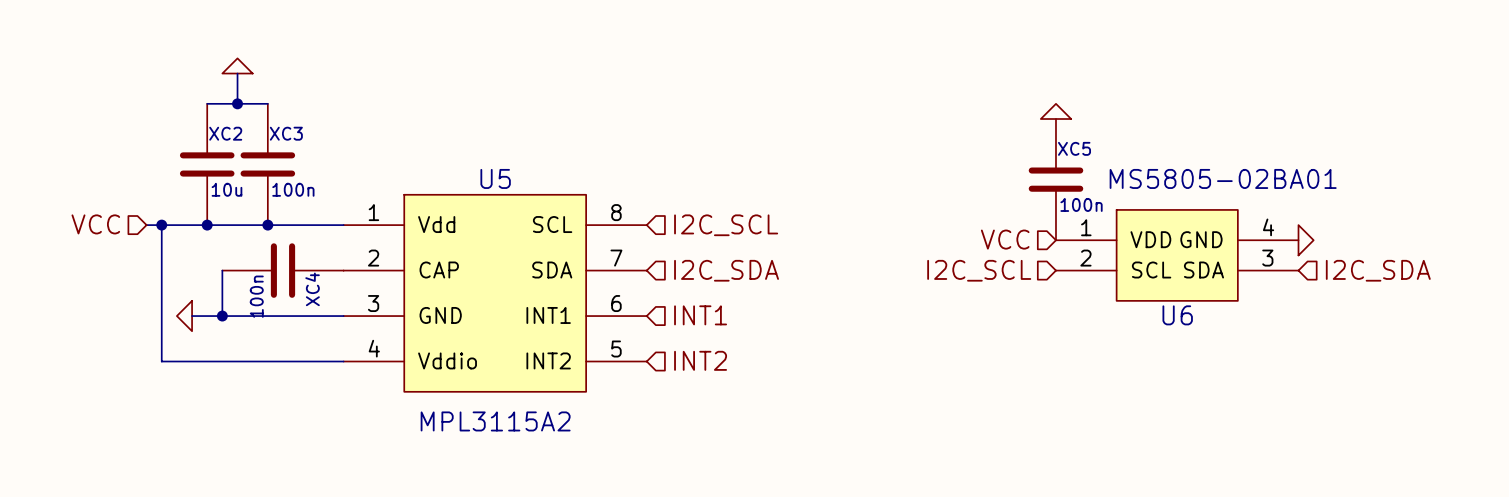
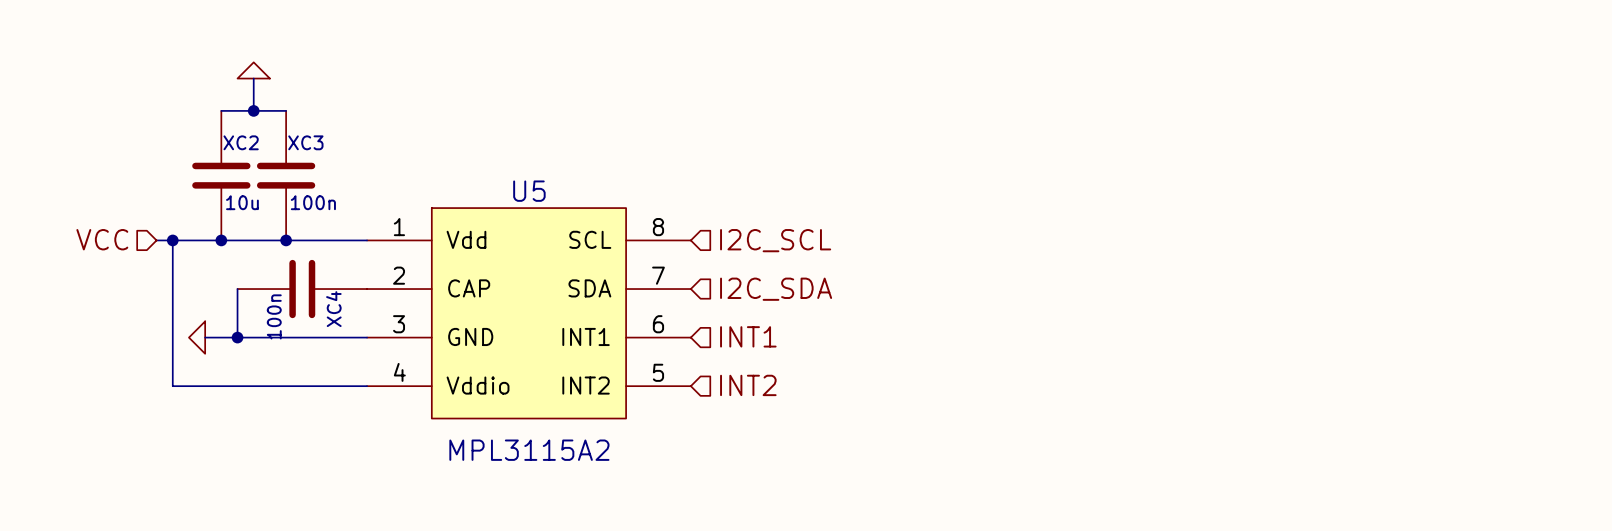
power symbol: (1055, 111) -> none
XC5: 100n (1055, 179) -> none
hierarchical label: VCC (1005, 239) -> none
power symbol: (1306, 240) -> none
U6: MS5805-02BA01 (1177, 255) -> none
hierarchical label: I2C_SCL (979, 270) -> none
hierarchical label: I2C_SDA (1378, 270) -> none

